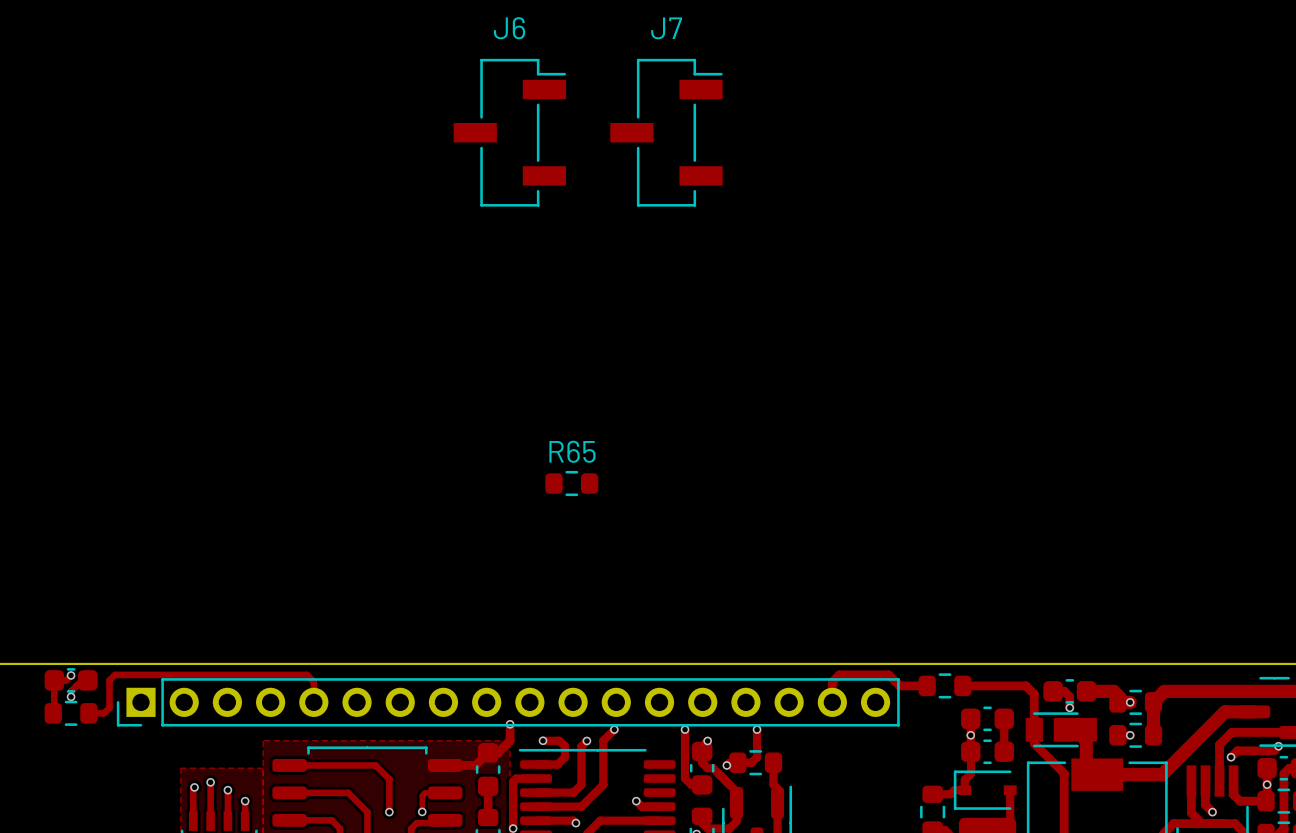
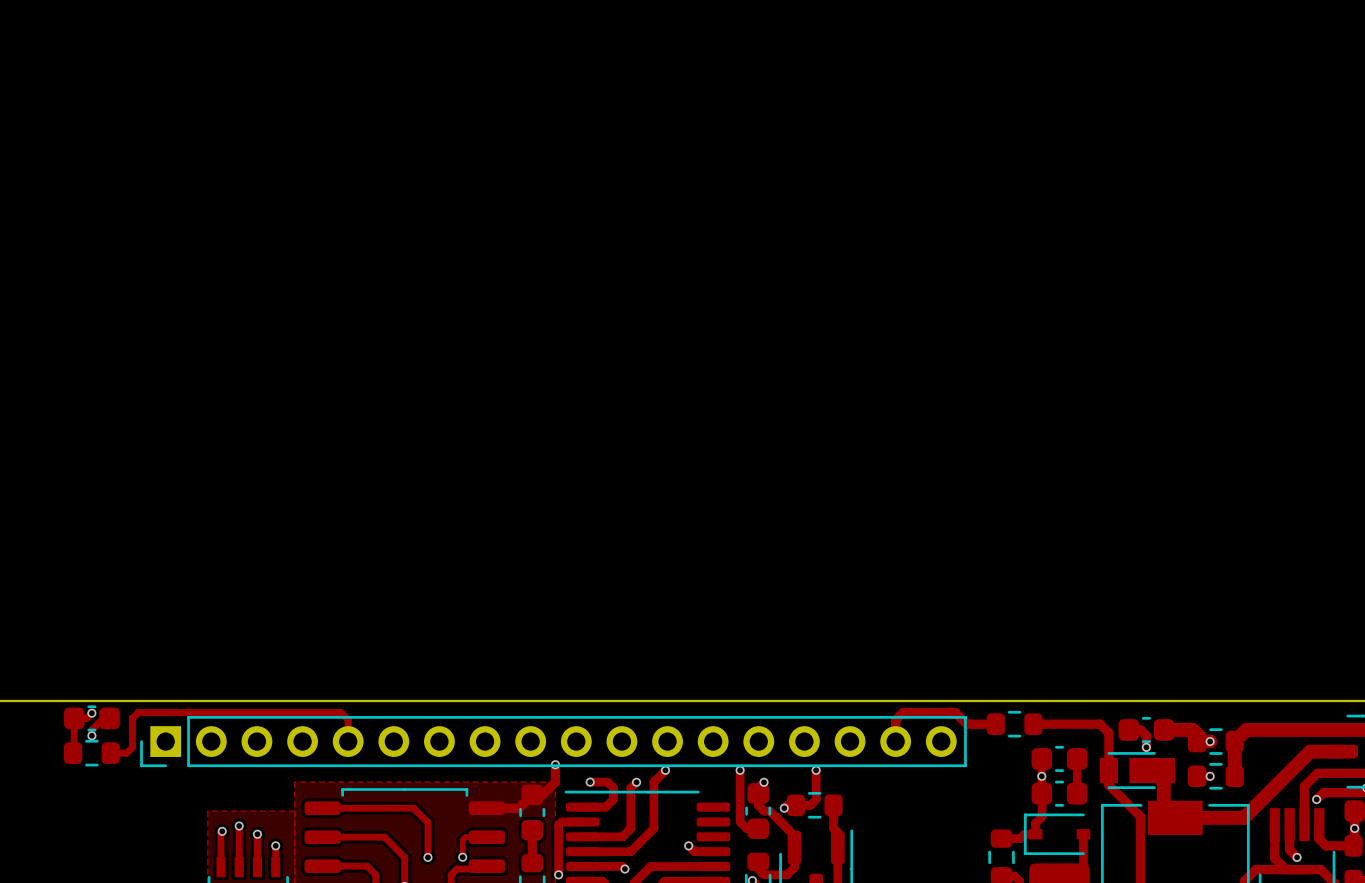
J6: (509, 132) -> none
J7: (666, 132) -> none
R65: (571, 483) -> none

